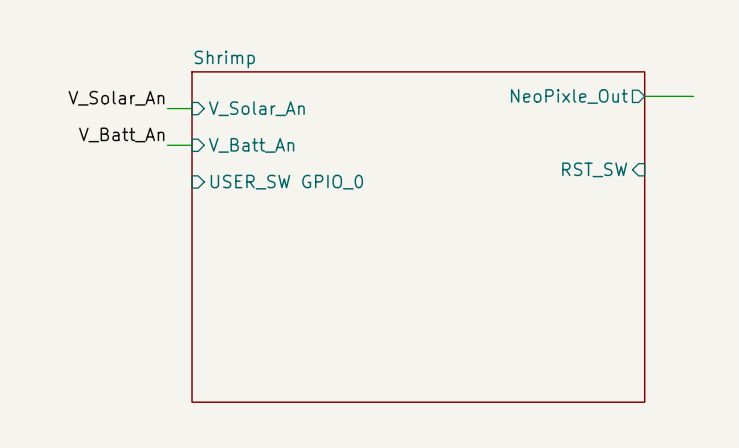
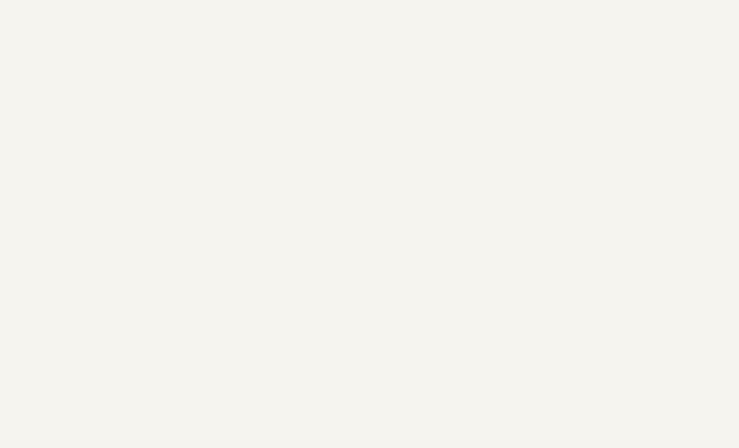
sheet pin: NeoPixle_Out (569, 96) -> none
wire: (644, 96) (693, 96) -> none
label: V_Solar_An (116, 98) -> none
wire: (167, 108) (192, 108) -> none
sheet pin: V_Solar_An (256, 108) -> none
label: V_Batt_An (121, 134) -> none
wire: (167, 145) (192, 145) -> none
sheet pin: V_Batt_An (251, 145) -> none
sheet pin: RST_SW (594, 169) -> none
sheet pin: USER_SW GPIO_0 (286, 182) -> none
sheet Shrimp: (418, 237) -> none

